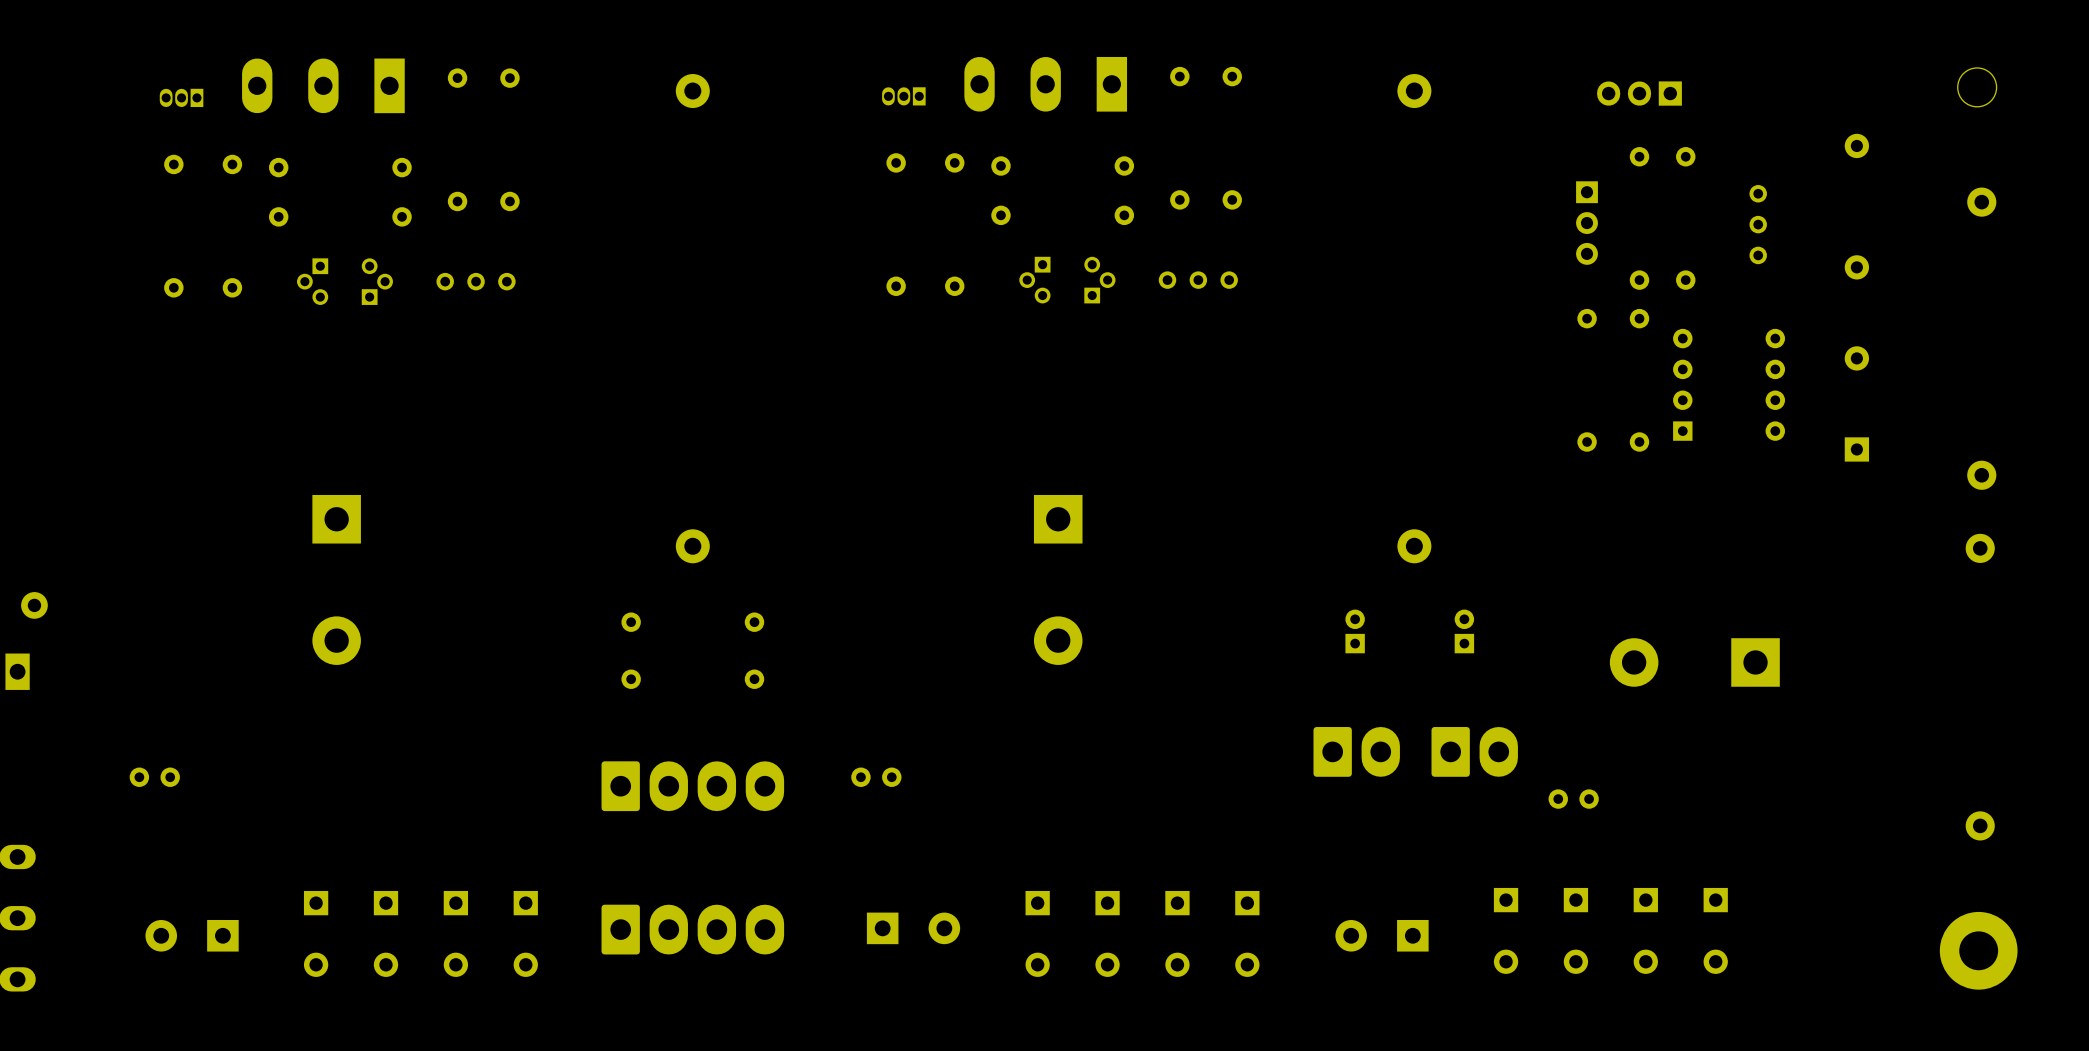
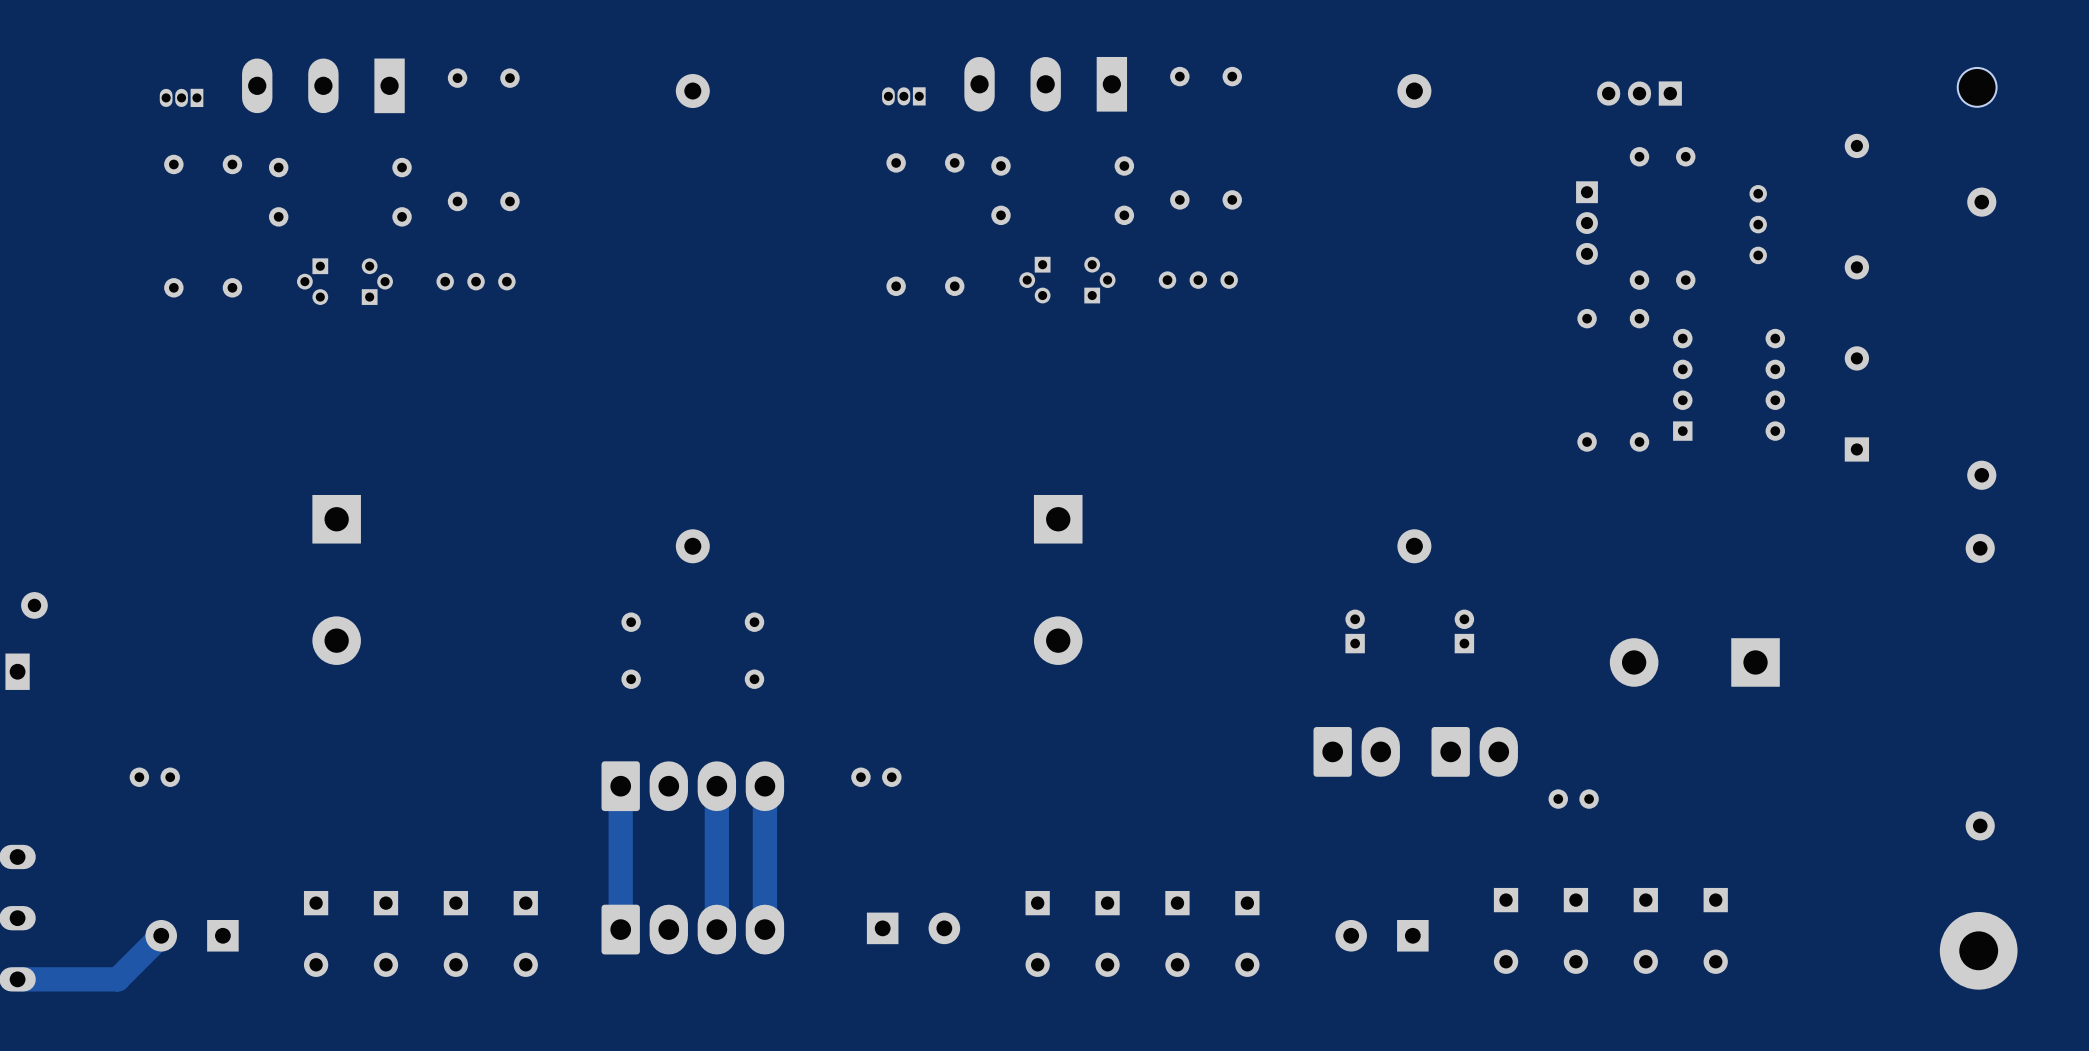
track: none -> (620, 786) (620, 929)
track: none -> (716, 786) (716, 929)
track: none -> (764, 786) (764, 929)
track: none -> (161, 935) (117, 979) (17, 979)

